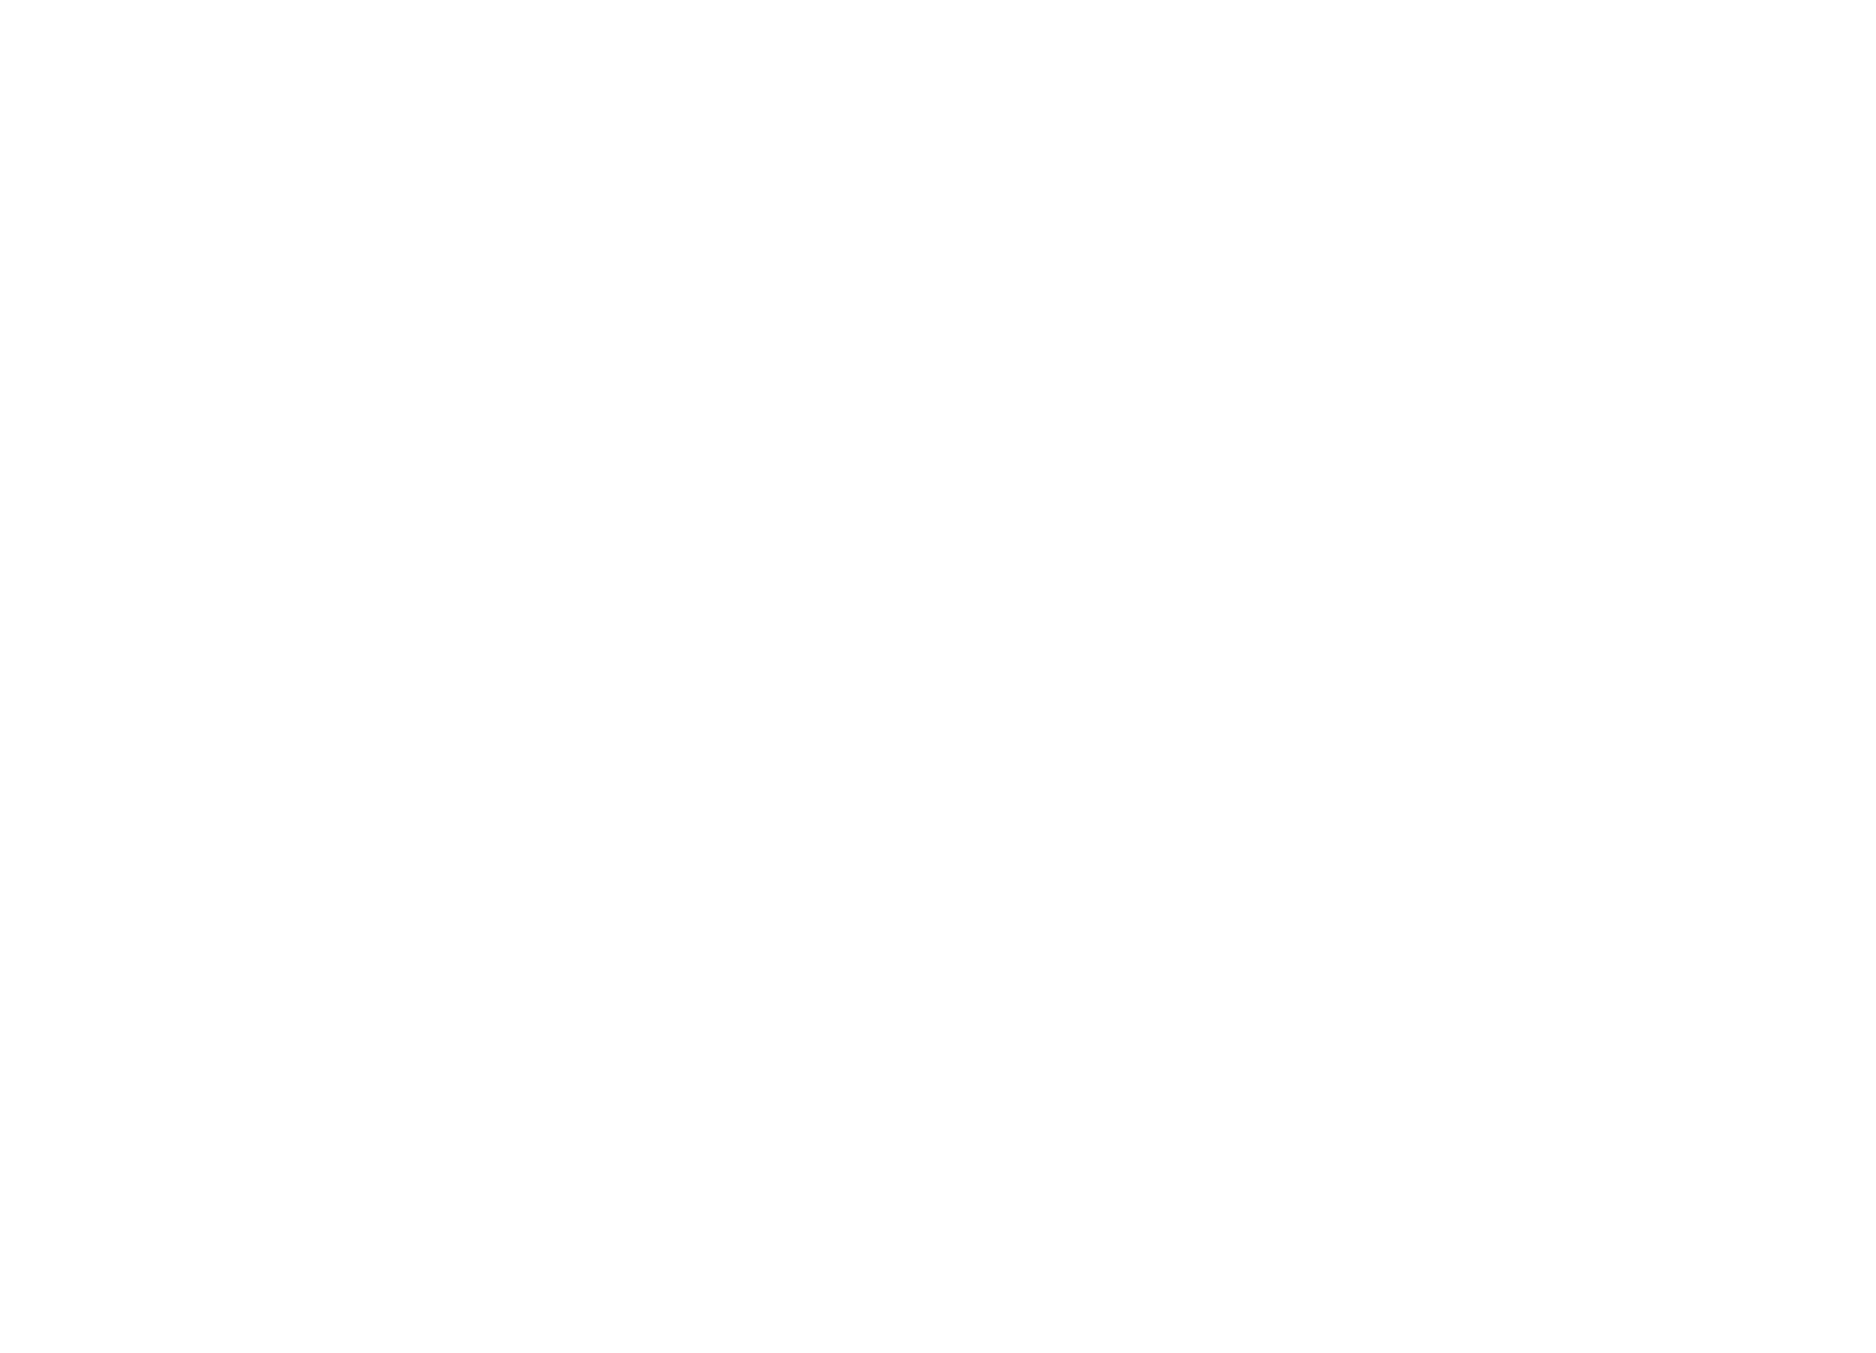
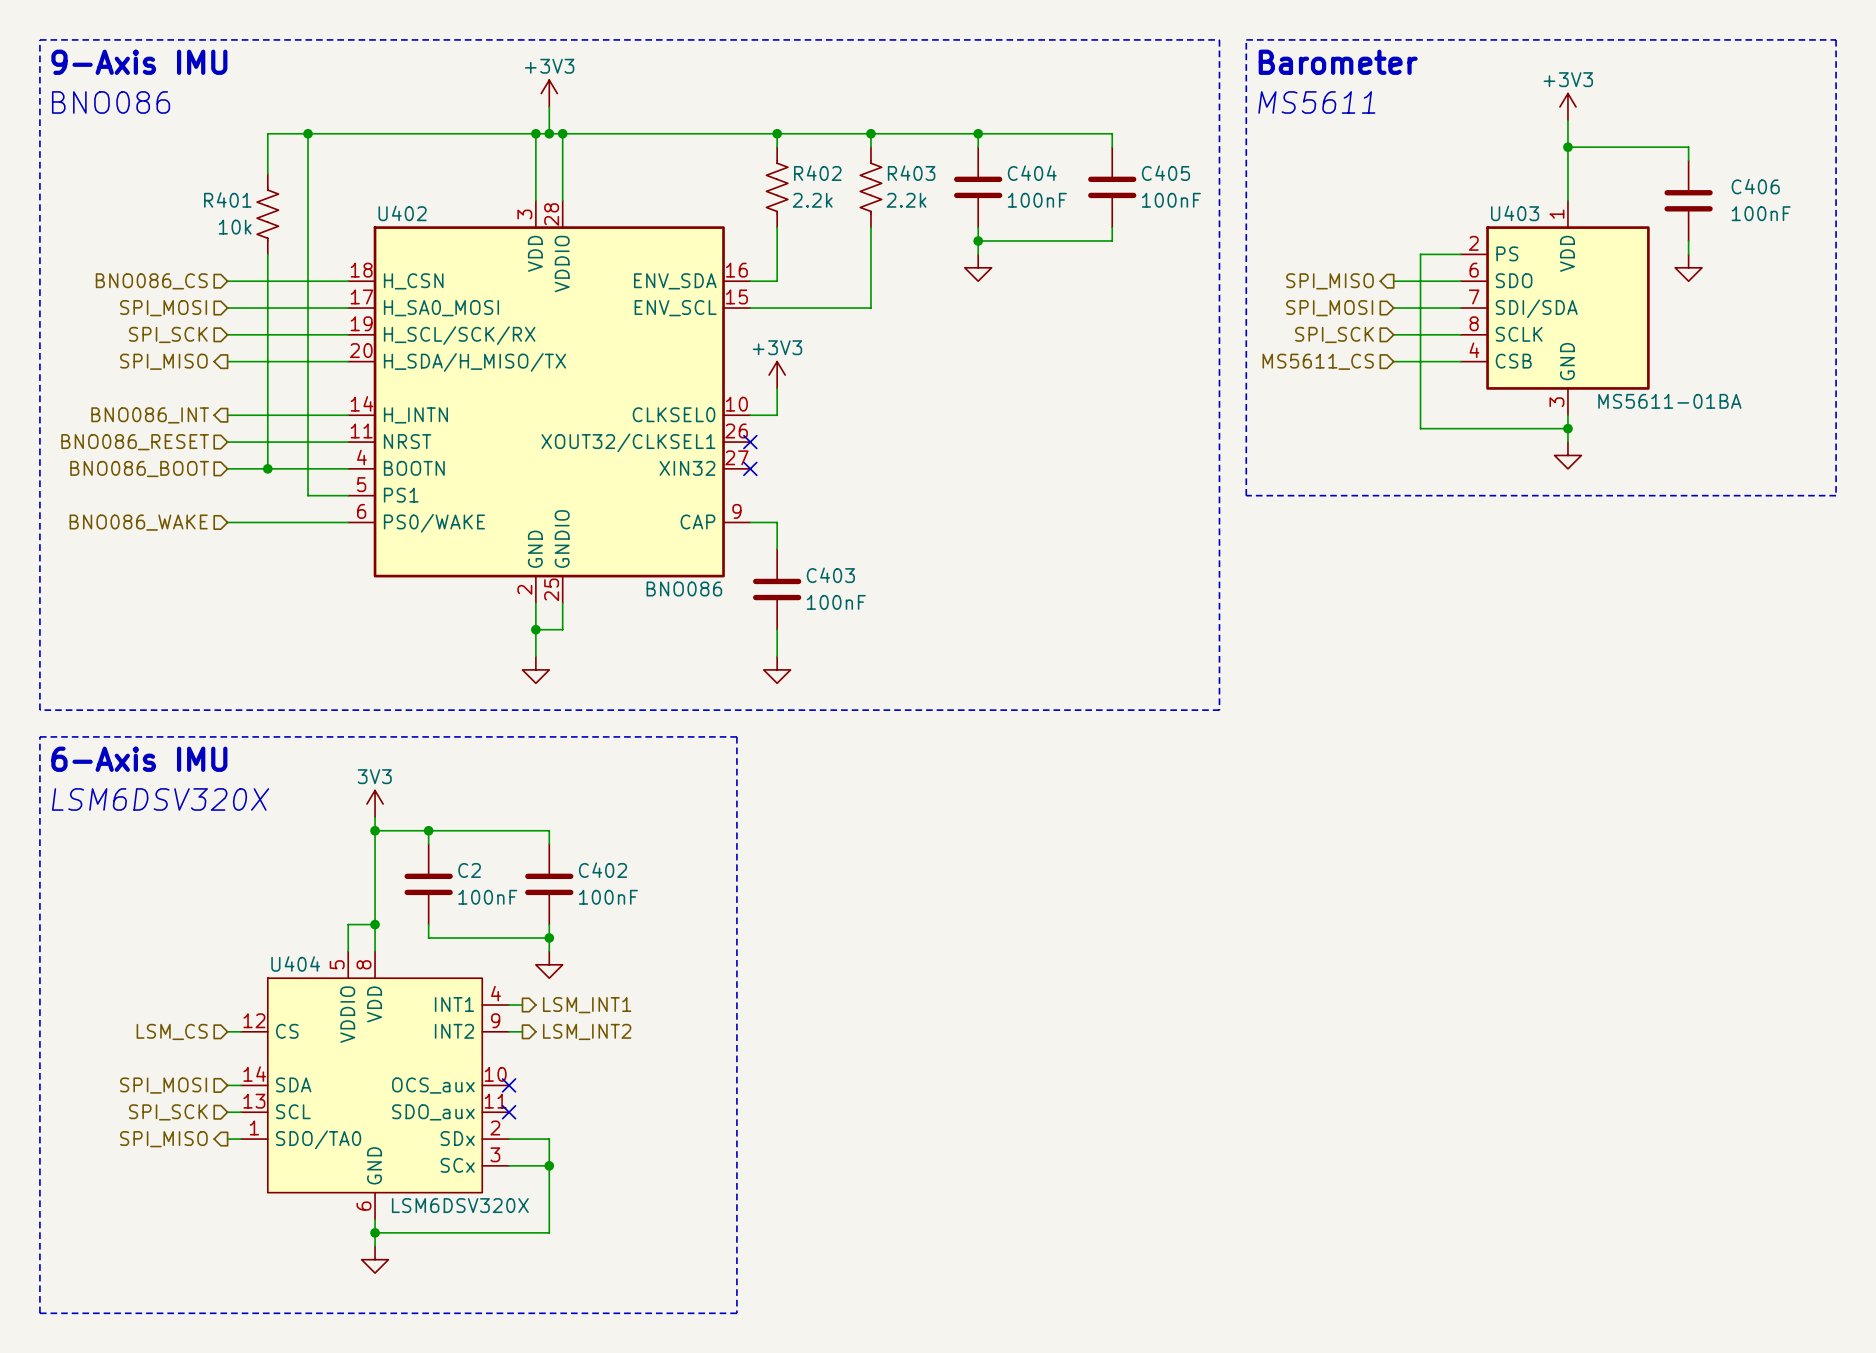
line: none -> (39, 39) (1219, 39) (1219, 710) (39, 710) (39, 39)
line: none -> (1246, 39) (1836, 39) (1836, 495) (1246, 495) (1246, 39)
text: none -> 9-Axis IMU (139, 62)
text: none -> Barometer (1338, 62)
power symbol: none -> +3V3 (549, 93)
text: none -> BNO086 (111, 102)
text: none -> MS5611 (1316, 102)
wire: none -> (549, 106) (549, 133)
power symbol: none -> +3V3 (1567, 106)
wire: none -> (1567, 120) (1567, 200)
wire: none -> (308, 133) (308, 495) (348, 495)
junction: none -> (308, 133)
wire: none -> (535, 133) (535, 200)
junction: none -> (535, 133)
junction: none -> (549, 133)
wire: none -> (562, 133) (562, 200)
junction: none -> (562, 133)
wire: none -> (777, 133) (777, 147)
junction: none -> (777, 133)
wire: none -> (870, 133) (870, 147)
junction: none -> (870, 133)
wire: none -> (978, 133) (978, 147)
junction: none -> (978, 133)
wire: none -> (1112, 147) (1112, 133) (267, 133) (267, 173)
wire: none -> (1567, 147) (1688, 147) (1688, 160)
junction: none -> (1567, 147)
R402: none -> 2.2k (777, 187)
R403: none -> 2.2k (870, 187)
C404: none -> 100nF (978, 187)
C405: none -> 100nF (1112, 187)
C406: none -> 100nF (1688, 200)
R401: none -> 10k (267, 214)
wire: none -> (777, 227) (777, 281) (750, 281)
wire: none -> (870, 227) (870, 308) (750, 308)
wire: none -> (978, 227) (978, 254)
wire: none -> (1112, 227) (1112, 241) (978, 241)
junction: none -> (978, 241)
wire: none -> (1688, 241) (1688, 254)
wire: none -> (267, 254) (267, 468)
wire: none -> (1460, 254) (1420, 254) (1420, 428) (1567, 428)
power symbol: none -> (978, 267)
power symbol: none -> (1688, 267)
hierarchical label: none -> BNO086_CS (151, 281)
wire: none -> (227, 281) (348, 281)
hierarchical label: none -> SPI_MISO (1330, 281)
wire: none -> (1393, 281) (1460, 281)
hierarchical label: none -> SPI_MOSI (163, 308)
wire: none -> (227, 308) (348, 308)
hierarchical label: none -> SPI_MOSI (1329, 308)
wire: none -> (1393, 308) (1460, 308)
U403: none -> MS5611-01BA (1555, 308)
hierarchical label: none -> SPI_SCK (168, 334)
wire: none -> (227, 334) (348, 334)
hierarchical label: none -> SPI_SCK (1334, 334)
wire: none -> (1393, 334) (1460, 334)
hierarchical label: none -> SPI_MISO (163, 361)
wire: none -> (227, 361) (348, 361)
hierarchical label: none -> MS5611_CS (1318, 361)
wire: none -> (1393, 361) (1460, 361)
power symbol: none -> +3V3 (777, 375)
wire: none -> (777, 388) (777, 415) (750, 415)
U402: none -> BNO086 (549, 401)
hierarchical label: none -> BNO086_INT (150, 415)
wire: none -> (227, 415) (348, 415)
wire: none -> (1567, 415) (1567, 442)
junction: none -> (1567, 428)
hierarchical label: none -> BNO086_RESET (135, 442)
wire: none -> (227, 442) (348, 442)
no-connect mark: none -> (750, 442)
power symbol: none -> (1567, 455)
wire: none -> (227, 468) (348, 468)
junction: none -> (267, 468)
no-connect mark: none -> (750, 468)
hierarchical label: none -> BNO086_BOOT (139, 469)
hierarchical label: none -> BNO086_WAKE (138, 522)
wire: none -> (227, 522) (348, 522)
wire: none -> (750, 522) (777, 522) (777, 549)
C403: none -> 100nF (777, 589)
wire: none -> (535, 602) (535, 656)
wire: none -> (562, 602) (562, 629) (535, 629)
junction: none -> (535, 629)
wire: none -> (777, 629) (777, 656)
power symbol: none -> (535, 669)
power symbol: none -> (777, 669)
line: none -> (39, 736) (736, 736) (736, 1313) (39, 1313) (39, 736)
text: none -> 6-Axis IMU (139, 759)
text: none -> LSM6DSV320X (160, 799)
power symbol: none -> 3V3 (375, 803)
wire: none -> (375, 817) (375, 951)
wire: none -> (375, 830) (549, 830) (549, 844)
junction: none -> (375, 830)
wire: none -> (428, 830) (428, 844)
junction: none -> (428, 830)
C2: none -> 100nF (428, 884)
C402: none -> 100nF (549, 884)
wire: none -> (375, 924) (348, 924) (348, 951)
junction: none -> (375, 924)
wire: none -> (428, 924) (428, 937) (549, 937)
wire: none -> (549, 924) (549, 951)
junction: none -> (549, 937)
power symbol: none -> (549, 964)
wire: none -> (509, 1005) (522, 1005)
hierarchical label: none -> LSM_INT1 (587, 1005)
hierarchical label: none -> LSM_CS (172, 1031)
wire: none -> (227, 1031) (241, 1031)
wire: none -> (509, 1031) (522, 1031)
hierarchical label: none -> LSM_INT2 (587, 1031)
hierarchical label: none -> SPI_MOSI (163, 1085)
wire: none -> (227, 1085) (241, 1085)
U404: none -> LSM6DSV320X (375, 1085)
no-connect mark: none -> (509, 1085)
hierarchical label: none -> SPI_SCK (168, 1112)
wire: none -> (227, 1112) (241, 1112)
no-connect mark: none -> (509, 1112)
hierarchical label: none -> SPI_MISO (163, 1139)
wire: none -> (227, 1139) (241, 1139)
wire: none -> (509, 1139) (549, 1139) (549, 1232) (375, 1232)
wire: none -> (509, 1165) (549, 1165)
junction: none -> (549, 1165)
wire: none -> (375, 1219) (375, 1246)
junction: none -> (375, 1232)
power symbol: none -> (375, 1259)

